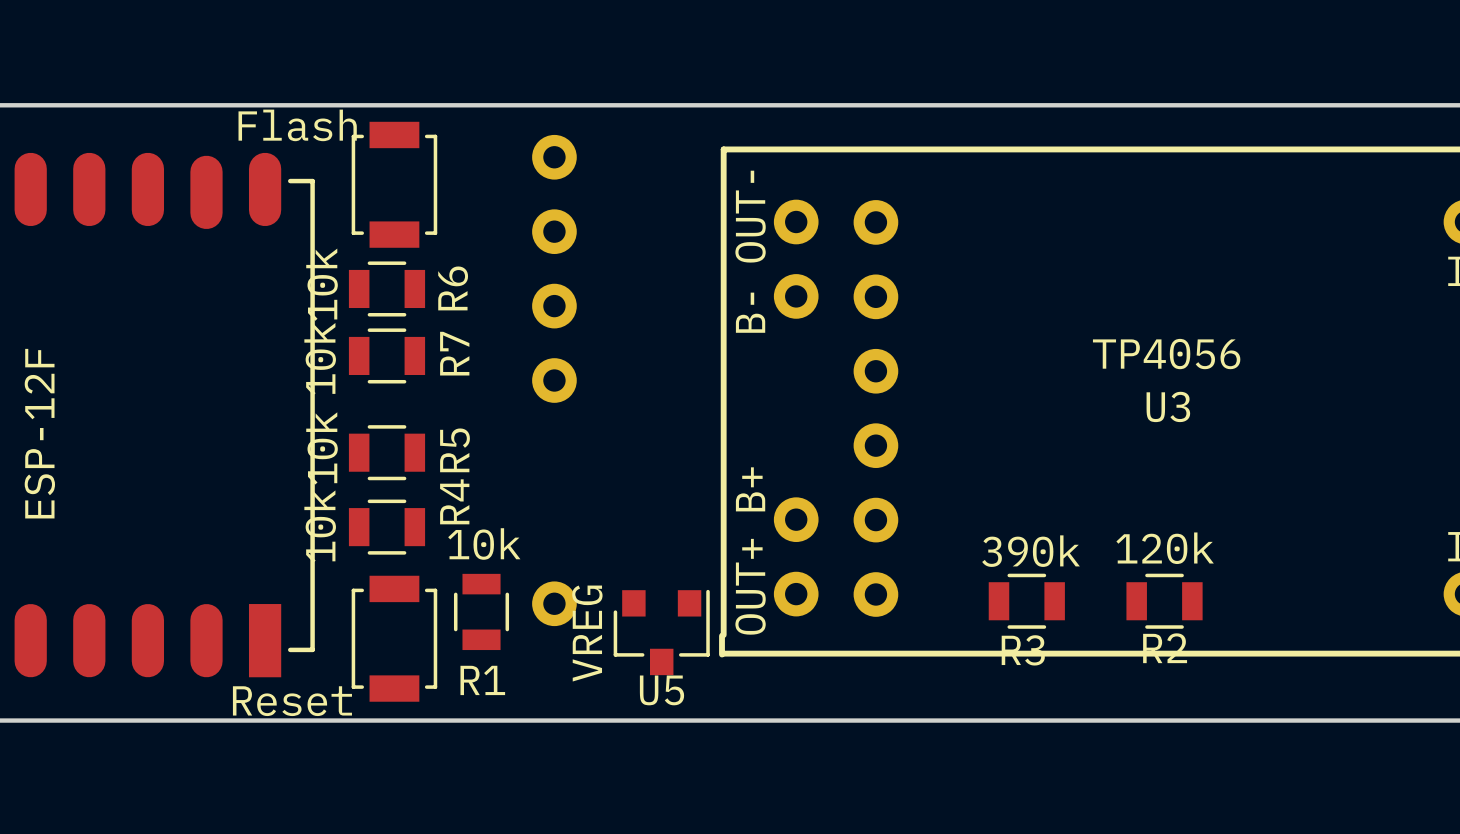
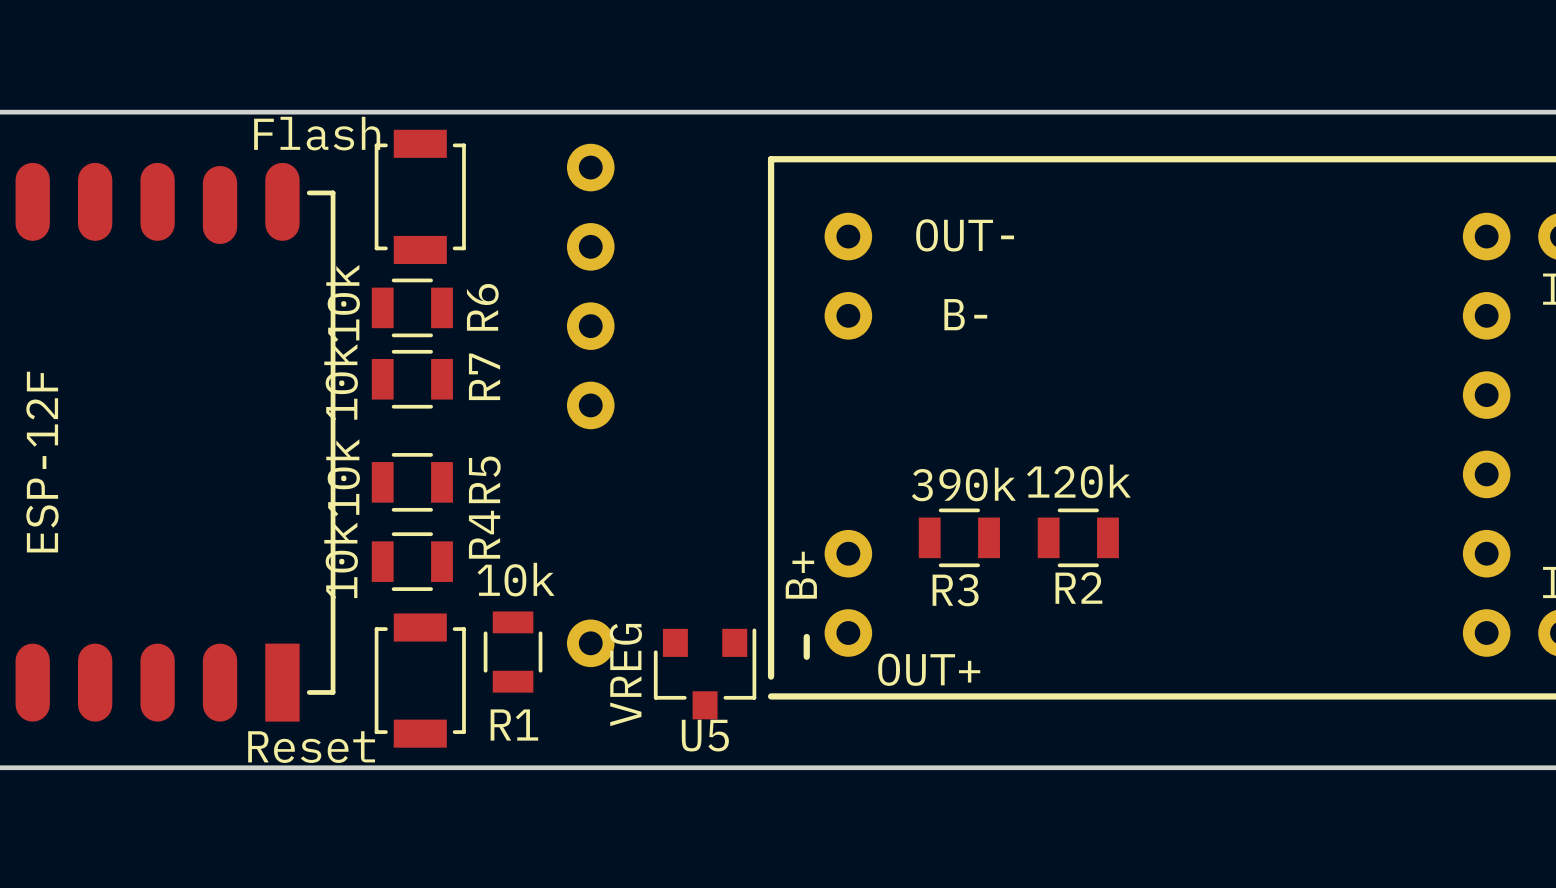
part text rotation: 0° (750, 216) -> 90° clockwise (965, 235)
part text position: OUT- (750, 216) -> OUT- (965, 235)
part text rotation: 0° (750, 312) -> 90° clockwise (965, 314)
part text position: B- (750, 312) -> B- (965, 314)
text: TP4056 (1166, 354) -> none
text: U3 (1168, 406) -> none
part position: (875, 408) -> (1486, 434)
part text position: B+ (750, 489) -> B+ (801, 575)
part text rotation: 0° (750, 586) -> 90° clockwise (929, 669)
R3 position: (1026, 601) -> (959, 537)
R2 position: (1164, 601) -> (1078, 537)
line: (722, 635) (722, 654) -> (806, 636) (806, 656)

